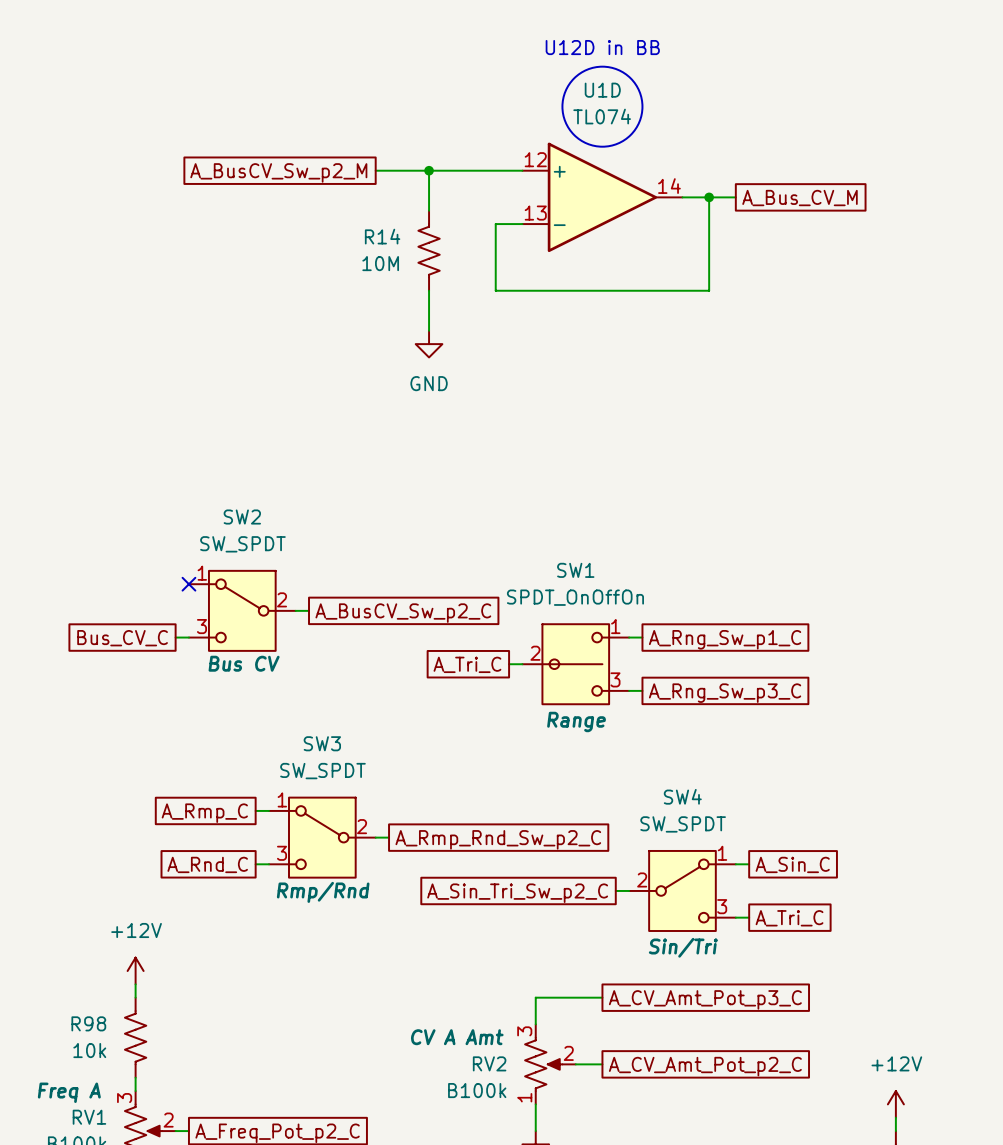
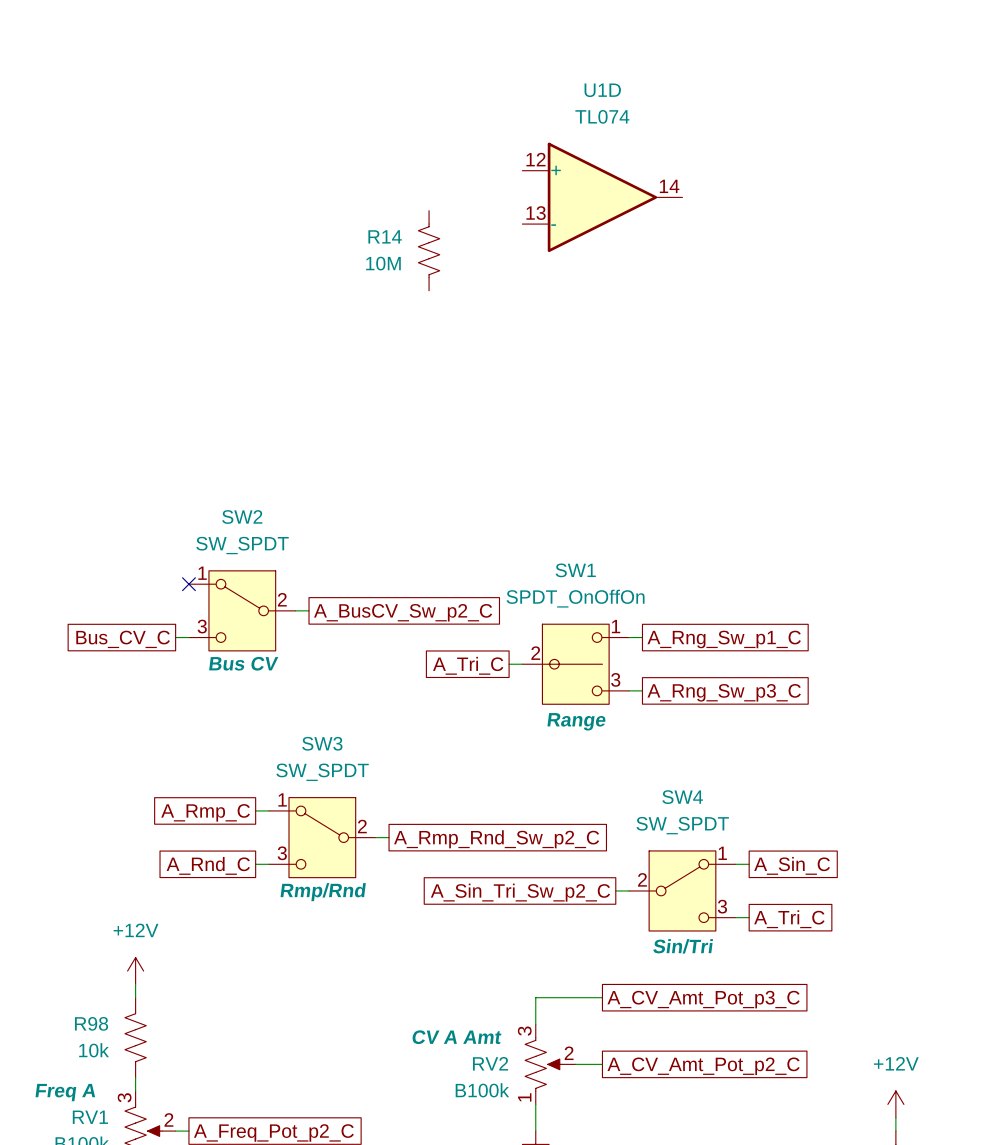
text: U12D in BB (602, 47) -> none
drawing: [562, 66, 643, 147] -> none
wire: (375, 170) (522, 170) -> none
wire: (429, 170) (429, 210) -> none
junction: (429, 170) -> none
global label: A_BusCV_Sw_p2_M (278, 172) -> none
wire: (682, 197) (735, 197) -> none
wire: (709, 197) (709, 290) (495, 290) (495, 224) (522, 224) -> none
junction: (709, 197) -> none
global label: A_Bus_CV_M (800, 198) -> none
wire: (429, 290) (429, 330) -> none
power symbol: GND (429, 344) -> none

